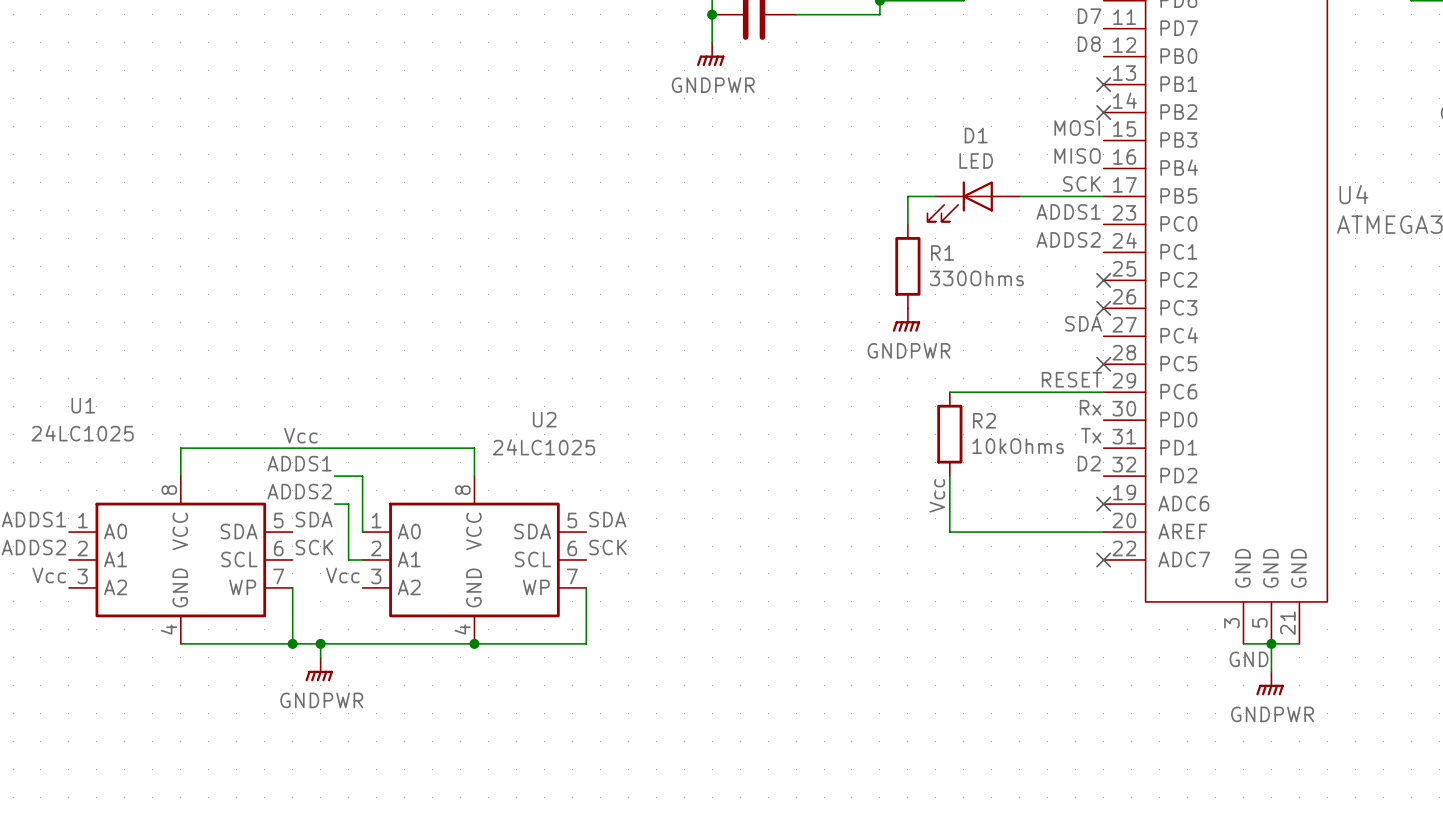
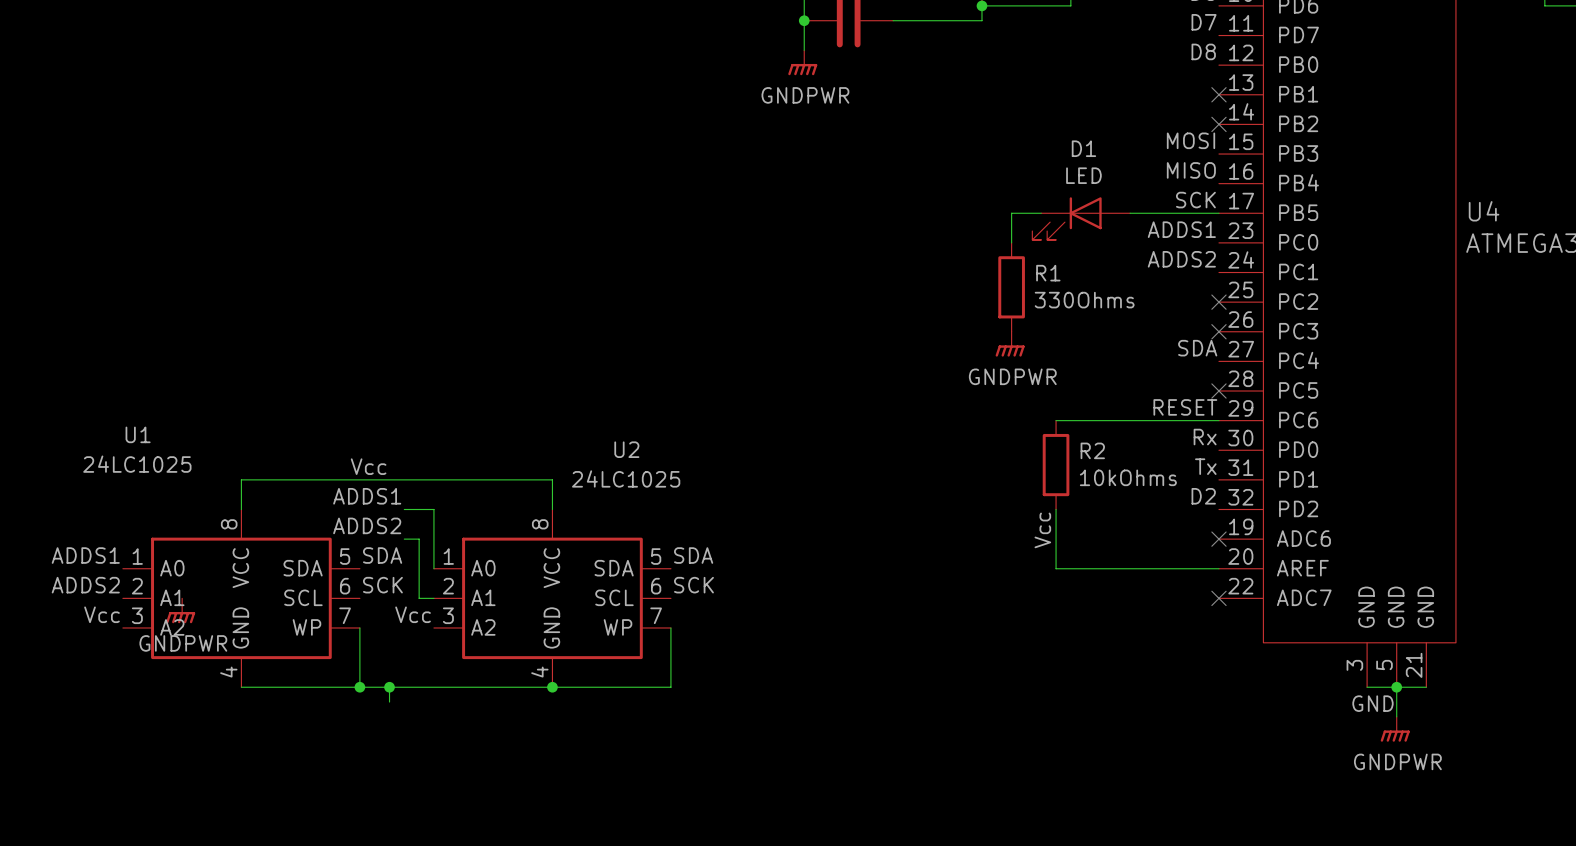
power symbol position: GNDPWR (319, 669) -> GNDPWR (180, 610)

